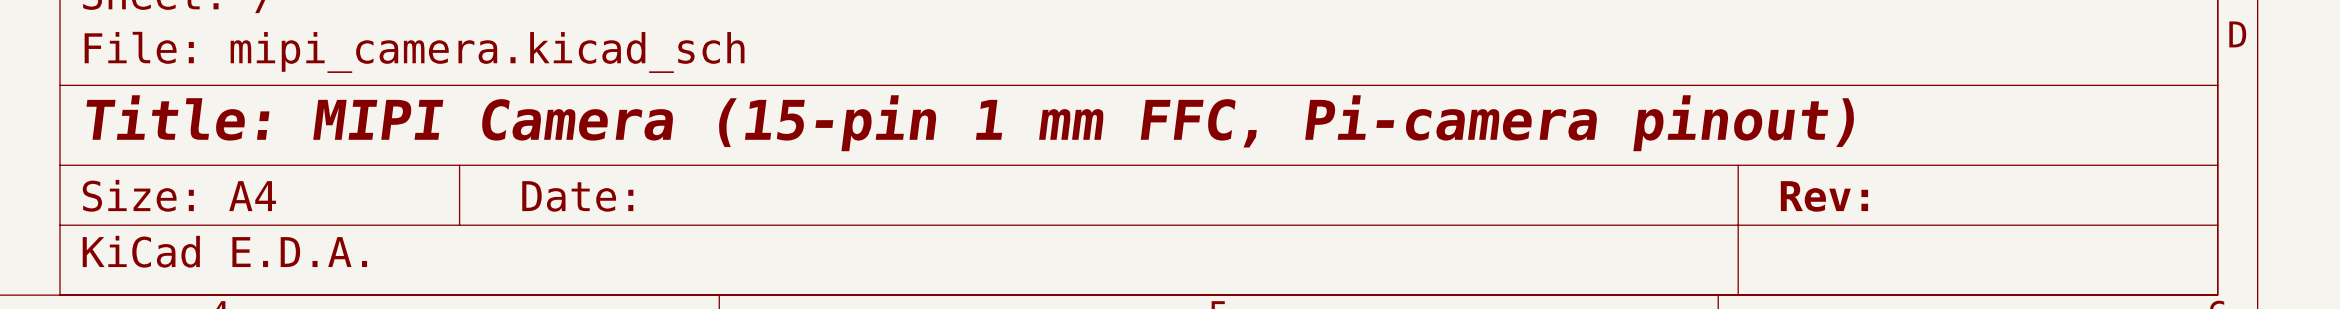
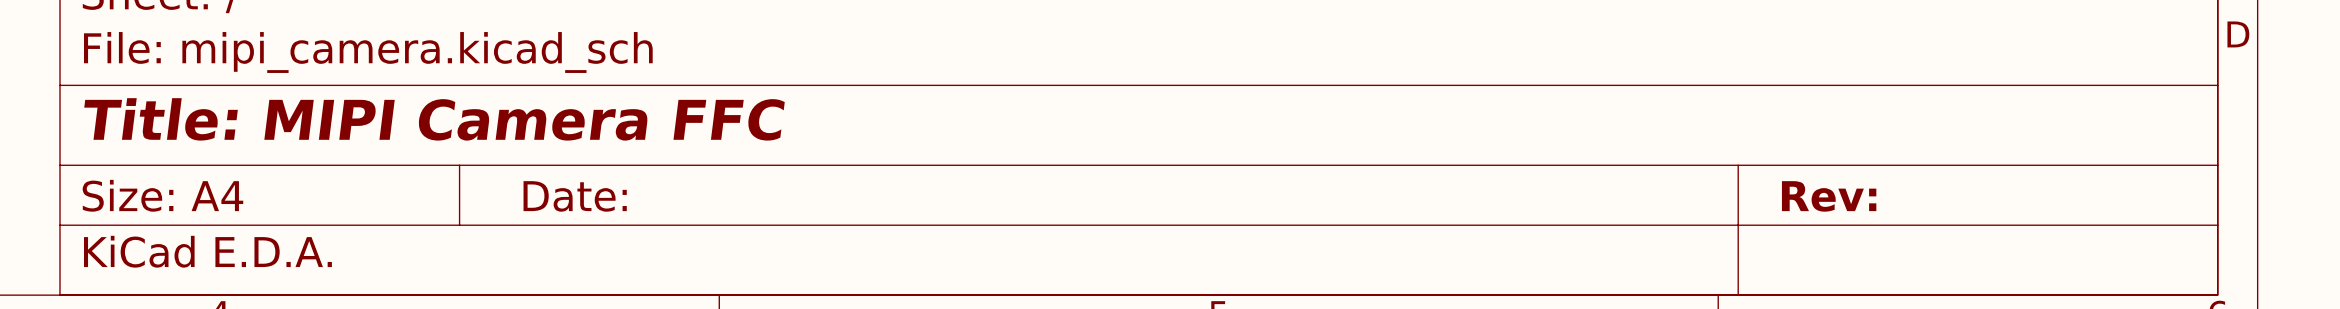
title block: Title: MIPI Camera (15-pin 1 mm FFC, Pi-camera pinout) (970, 123) -> Title: MIPI Camera FFC (434, 119)

